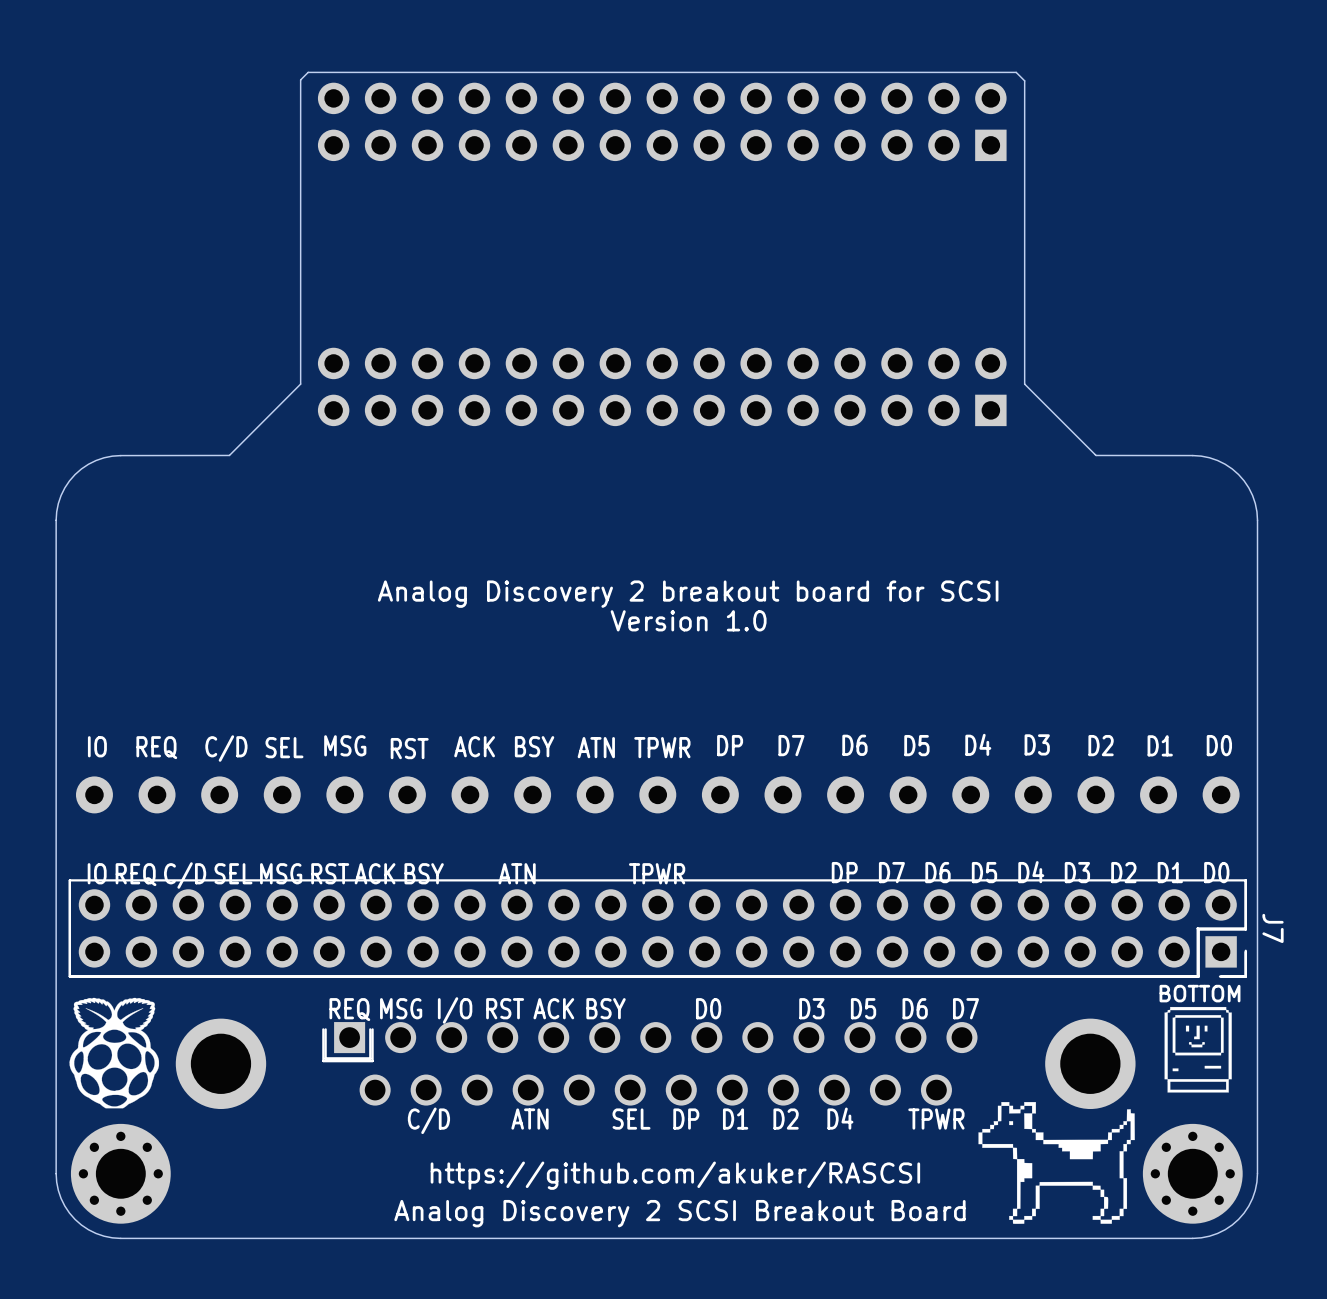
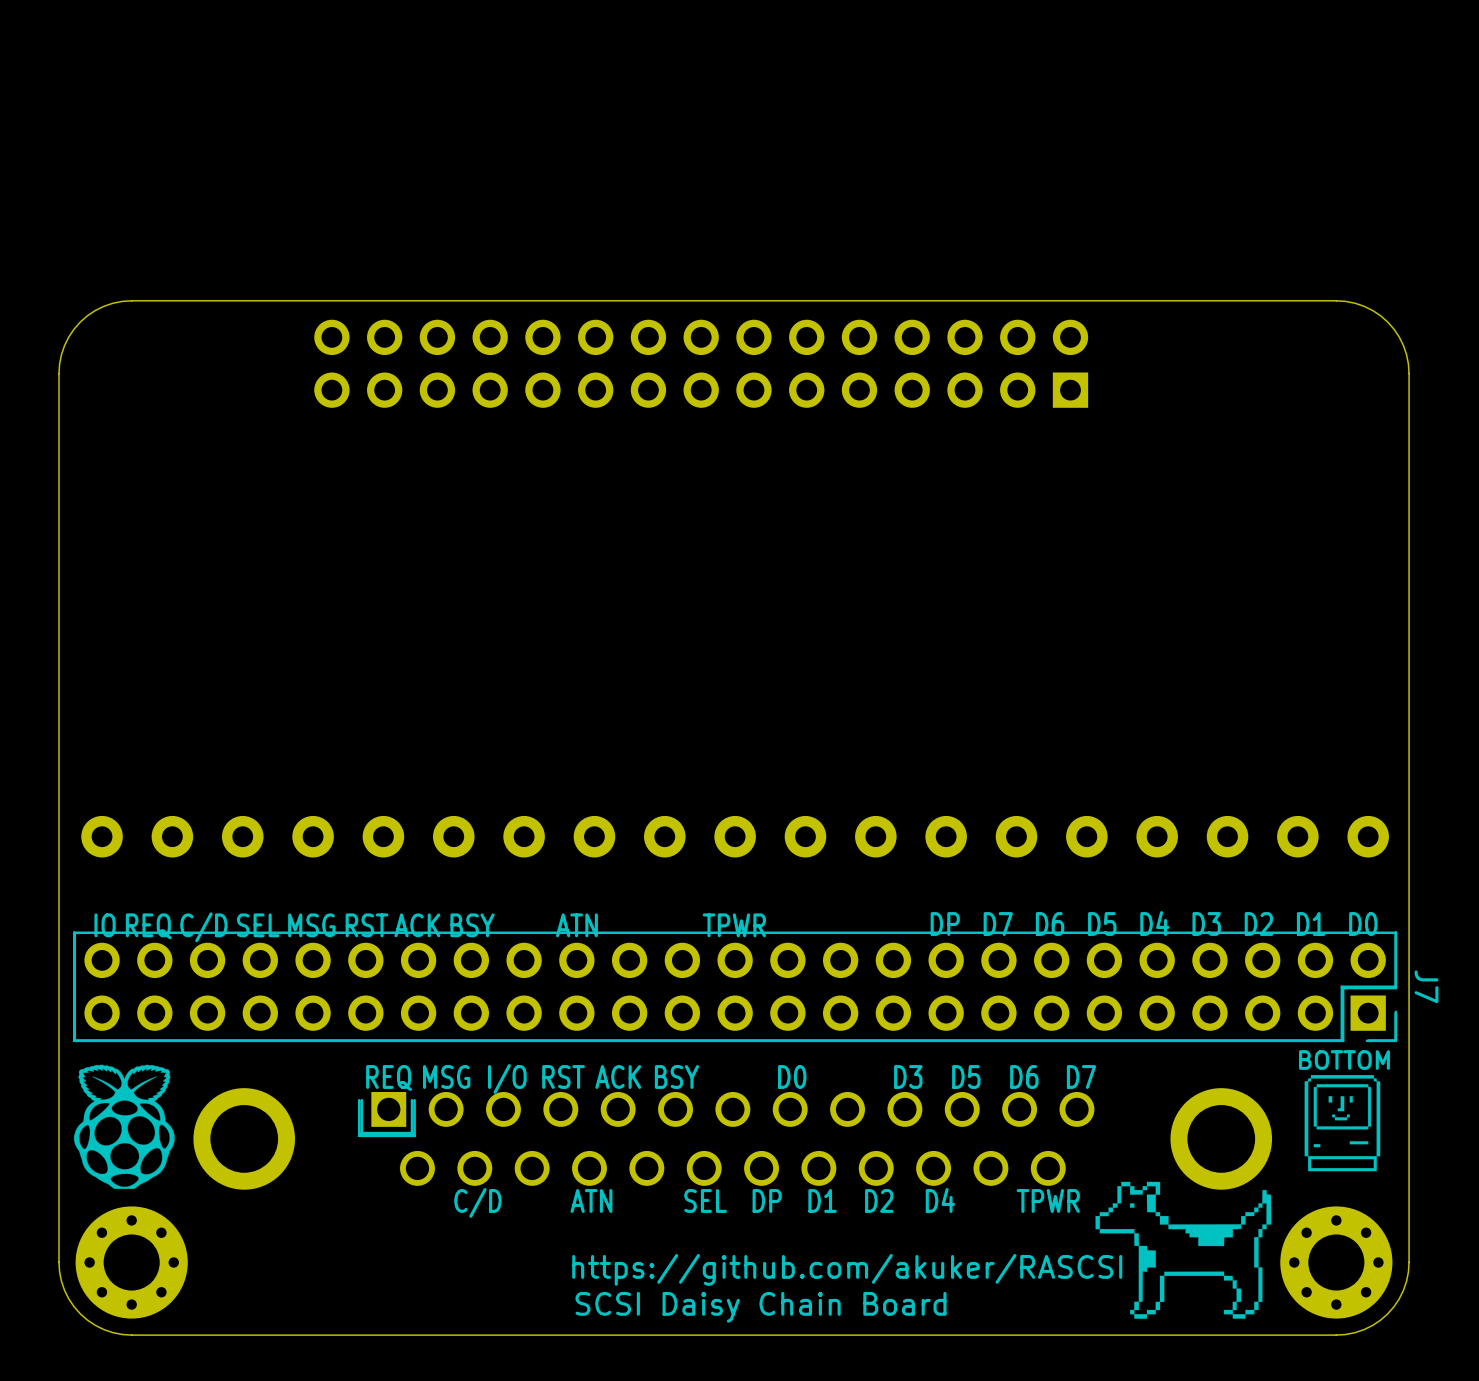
part: (662, 121) -> none
part position: (662, 386) -> (701, 363)
board edge: (56, 520) (58, 503) (64, 487) (75, 474) (88, 464) (104, 457) (120, 455) (229, 455) (300, 384) (300, 79) (308, 72) (1016, 72) (1024, 80) (1024, 384) (1096, 455) (1192, 455) (1209, 457) (1225, 464) (1238, 474) (1248, 487) (1255, 503) (1257, 520) (1257, 1173) -> (58, 528) (58, 373) (61, 354) (74, 329) (87, 315) (103, 306) (122, 301) (1336, 300) (1355, 303) (1372, 310) (1387, 322) (1399, 337) (1406, 354) (1409, 373) (1409, 1262)
text: Analog Discovery 2 breakout board for SCSI (688, 594) -> none
text: Version 1.0 (688, 620) -> none
text: D4 (978, 744) -> none
text: D3 (1037, 744) -> none
text: MSG (345, 745) -> none
text: DP (730, 745) -> none
text: D7 (791, 745) -> none
text: D6 (854, 745) -> none
text: D5 (916, 745) -> none
text: D2 (1101, 745) -> none
text: D1 (1160, 745) -> none
text: D0 (1219, 745) -> none
text: IO (97, 746) -> none
text: ACK (474, 746) -> none
text: BSY (534, 746) -> none
text: REQ (156, 747) -> none
text: SEL (284, 747) -> none
text: ATN (596, 747) -> none
text: TPWR (662, 747) -> none
text: C/D (226, 748) -> none
text: RST (409, 748) -> none
text position: https://github.com/akuker/RASCSI (675, 1175) -> https://github.com/akuker/RASCSI (847, 1269)
text: Analog Discovery 2 SCSI Breakout Board (679, 1213) -> SCSI Daisy Chain Board (761, 1307)

